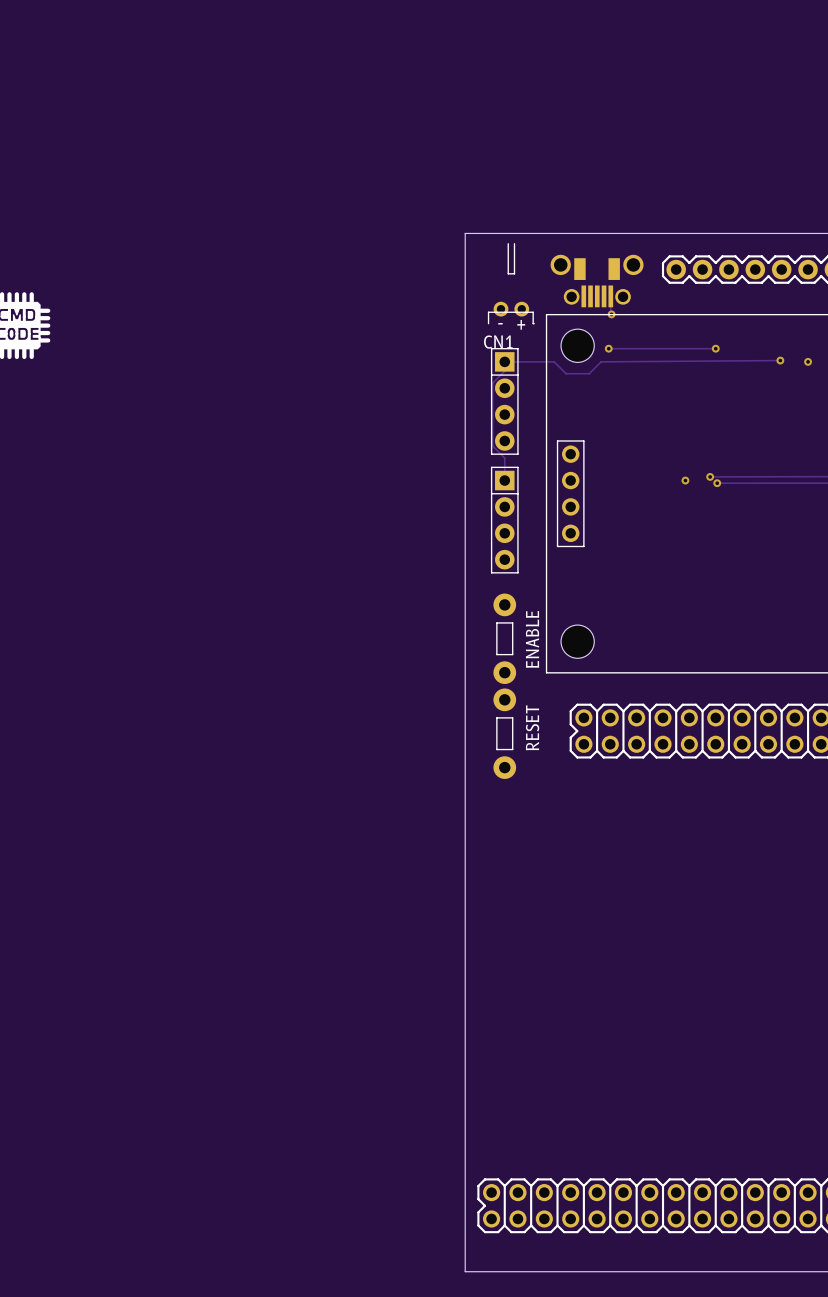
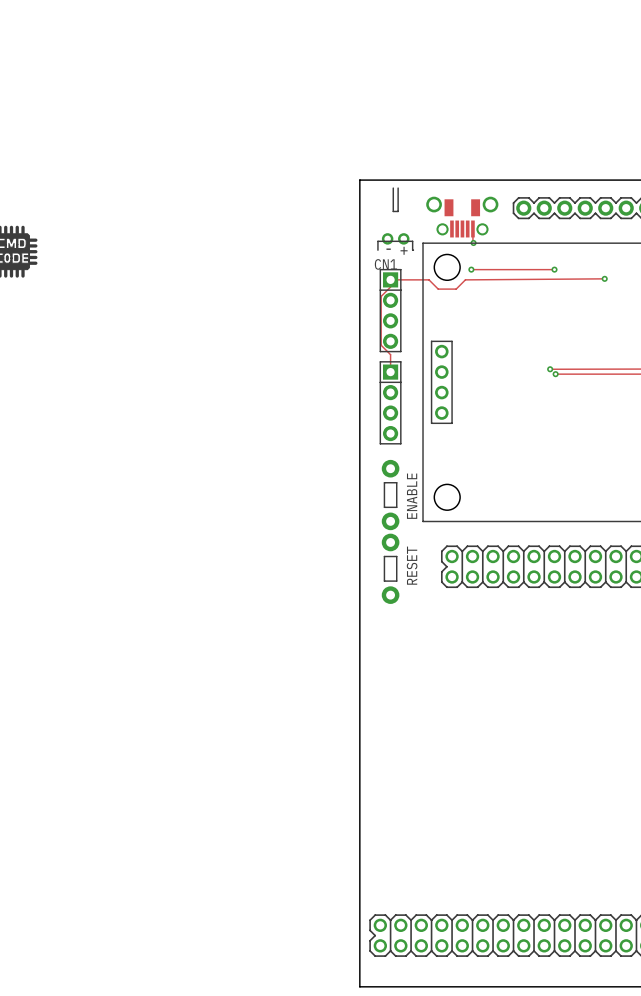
via: (808, 361) -> none
via: (685, 480) -> none

